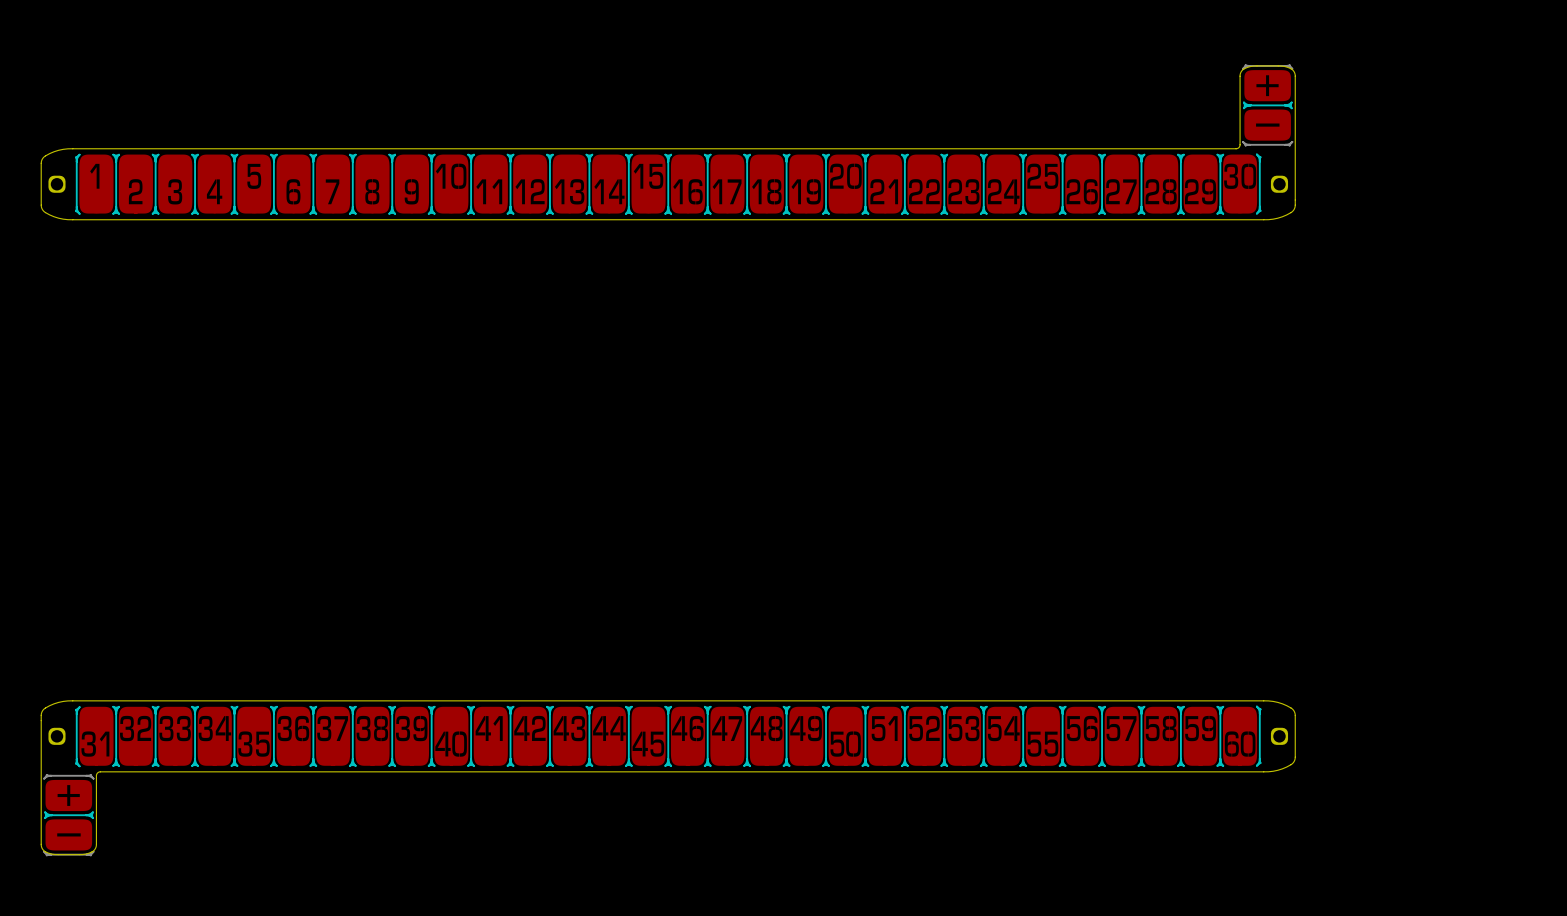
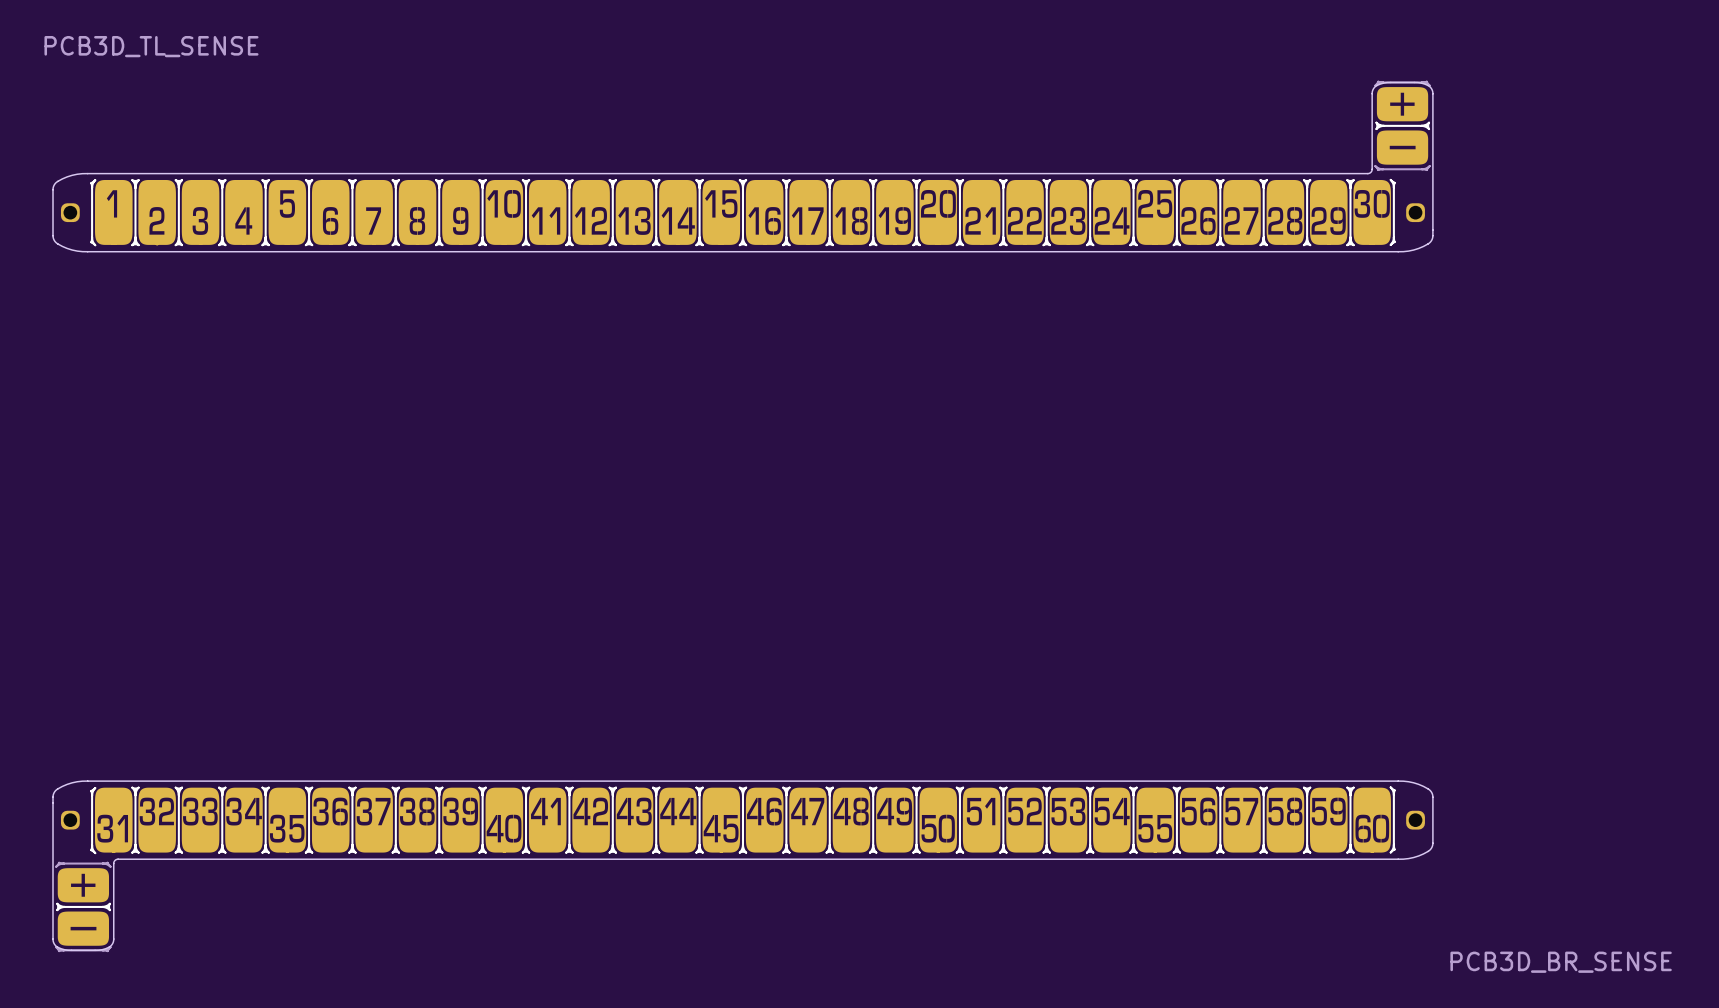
text: none -> PCB3D_TL_SENSE (151, 46)
text: none -> PCB3D_BR_SENSE (1561, 962)

